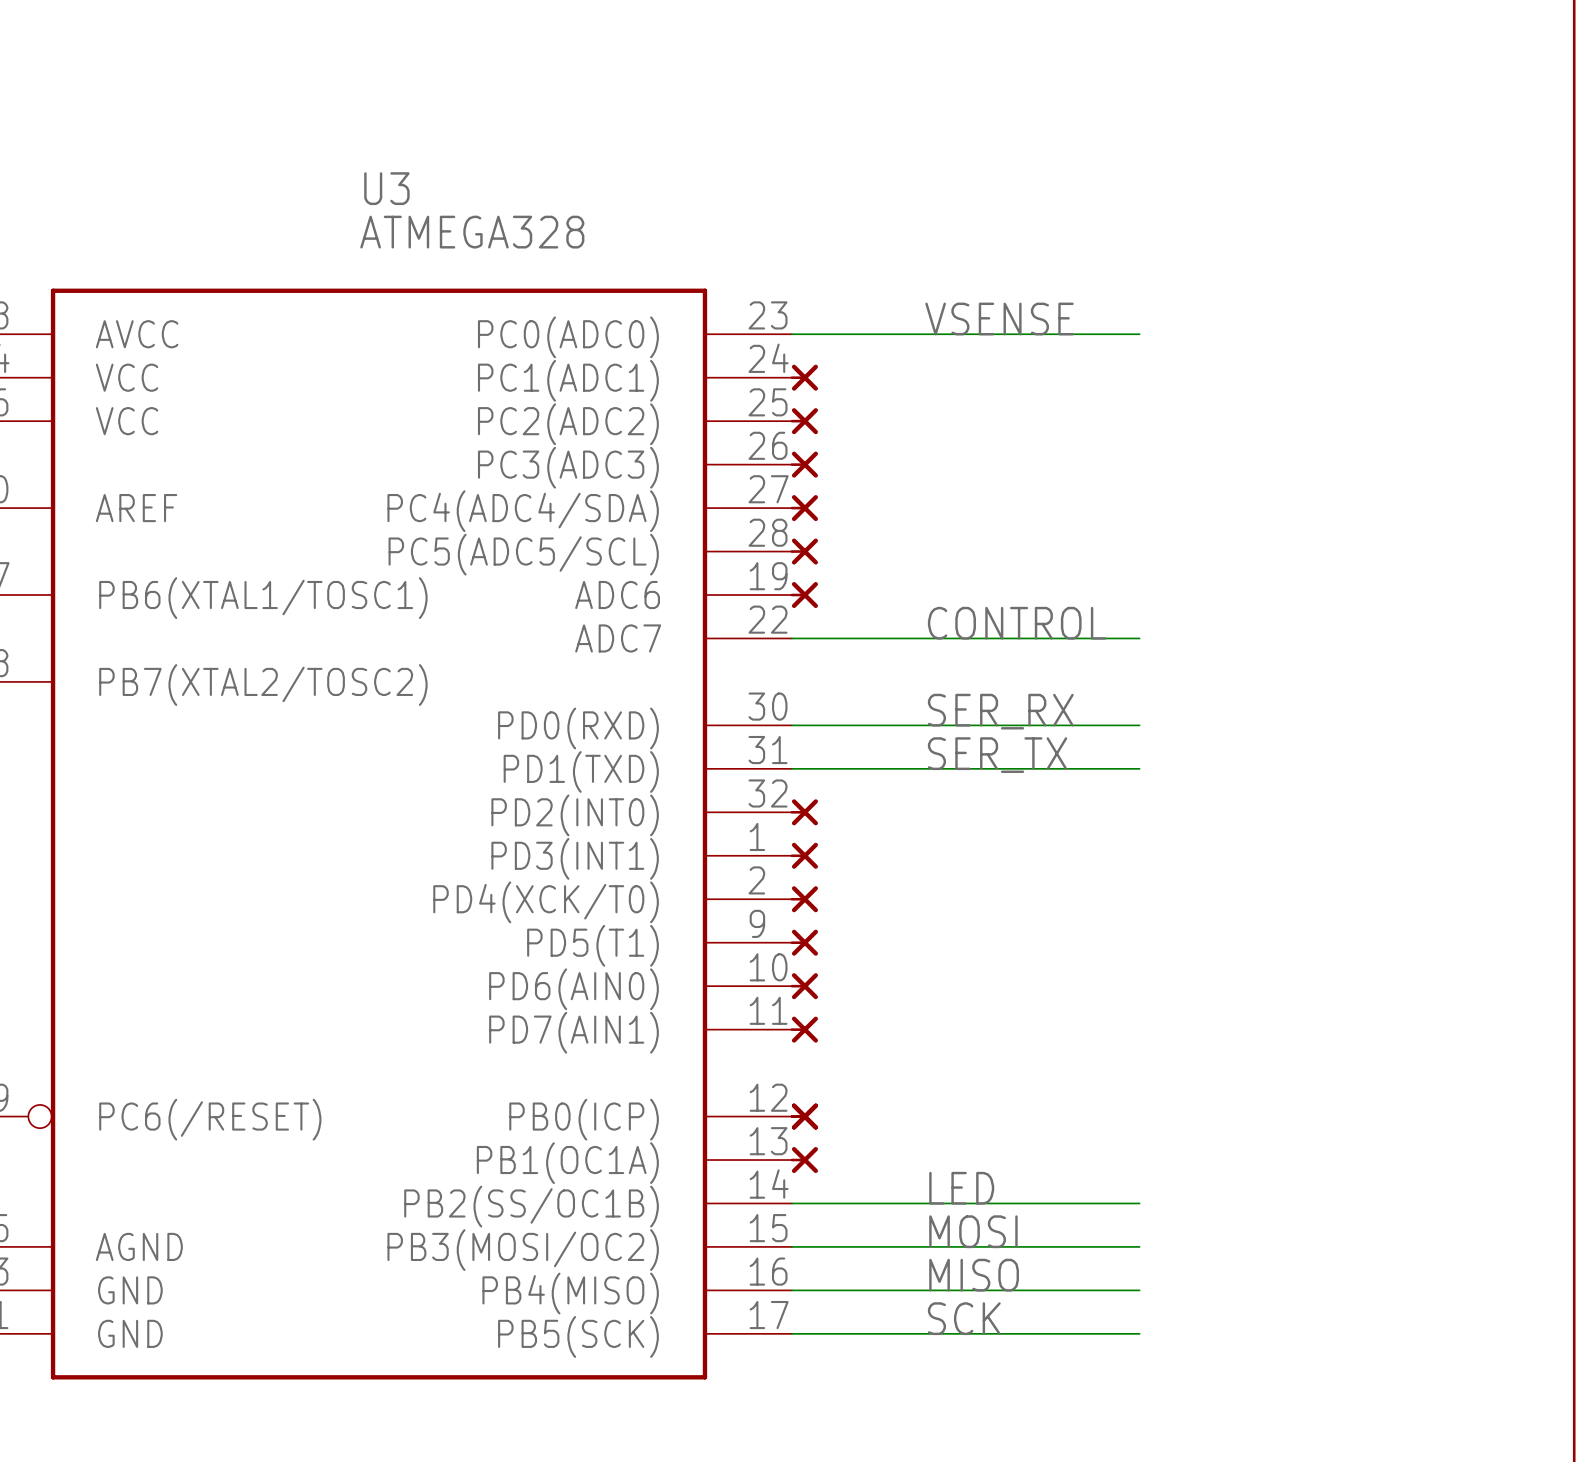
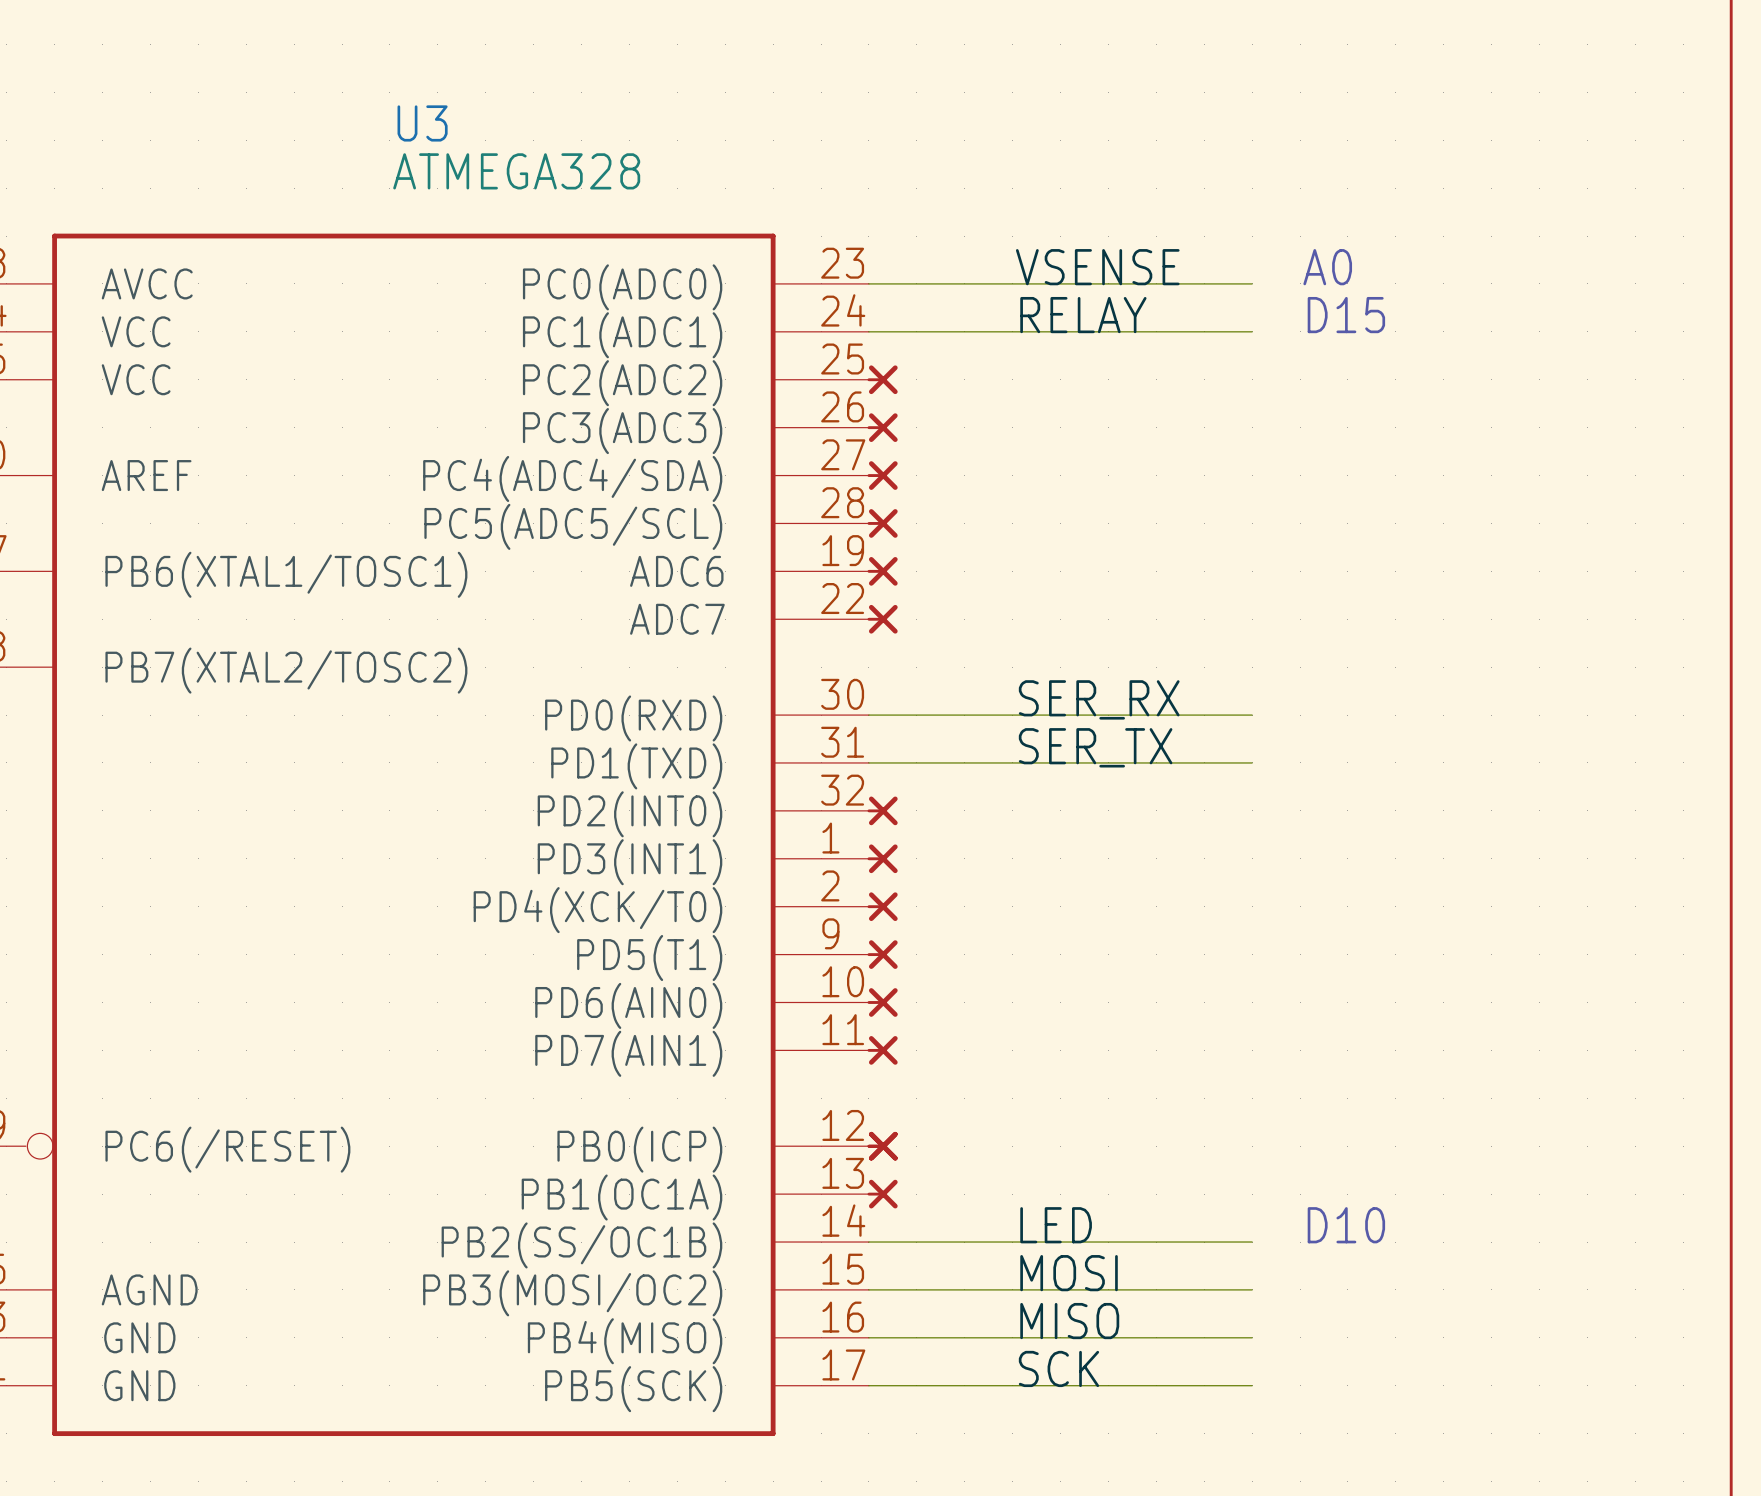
text: none -> A0 (1327, 267)
label: none -> RELAY (1083, 315)
text: none -> D15 (1346, 315)
part position: (804, 377) -> (882, 619)
label: CONTROL (1017, 623) -> none
wire: (791, 638) (1139, 638) -> (868, 331) (1252, 331)
text: none -> D10 (1346, 1225)

